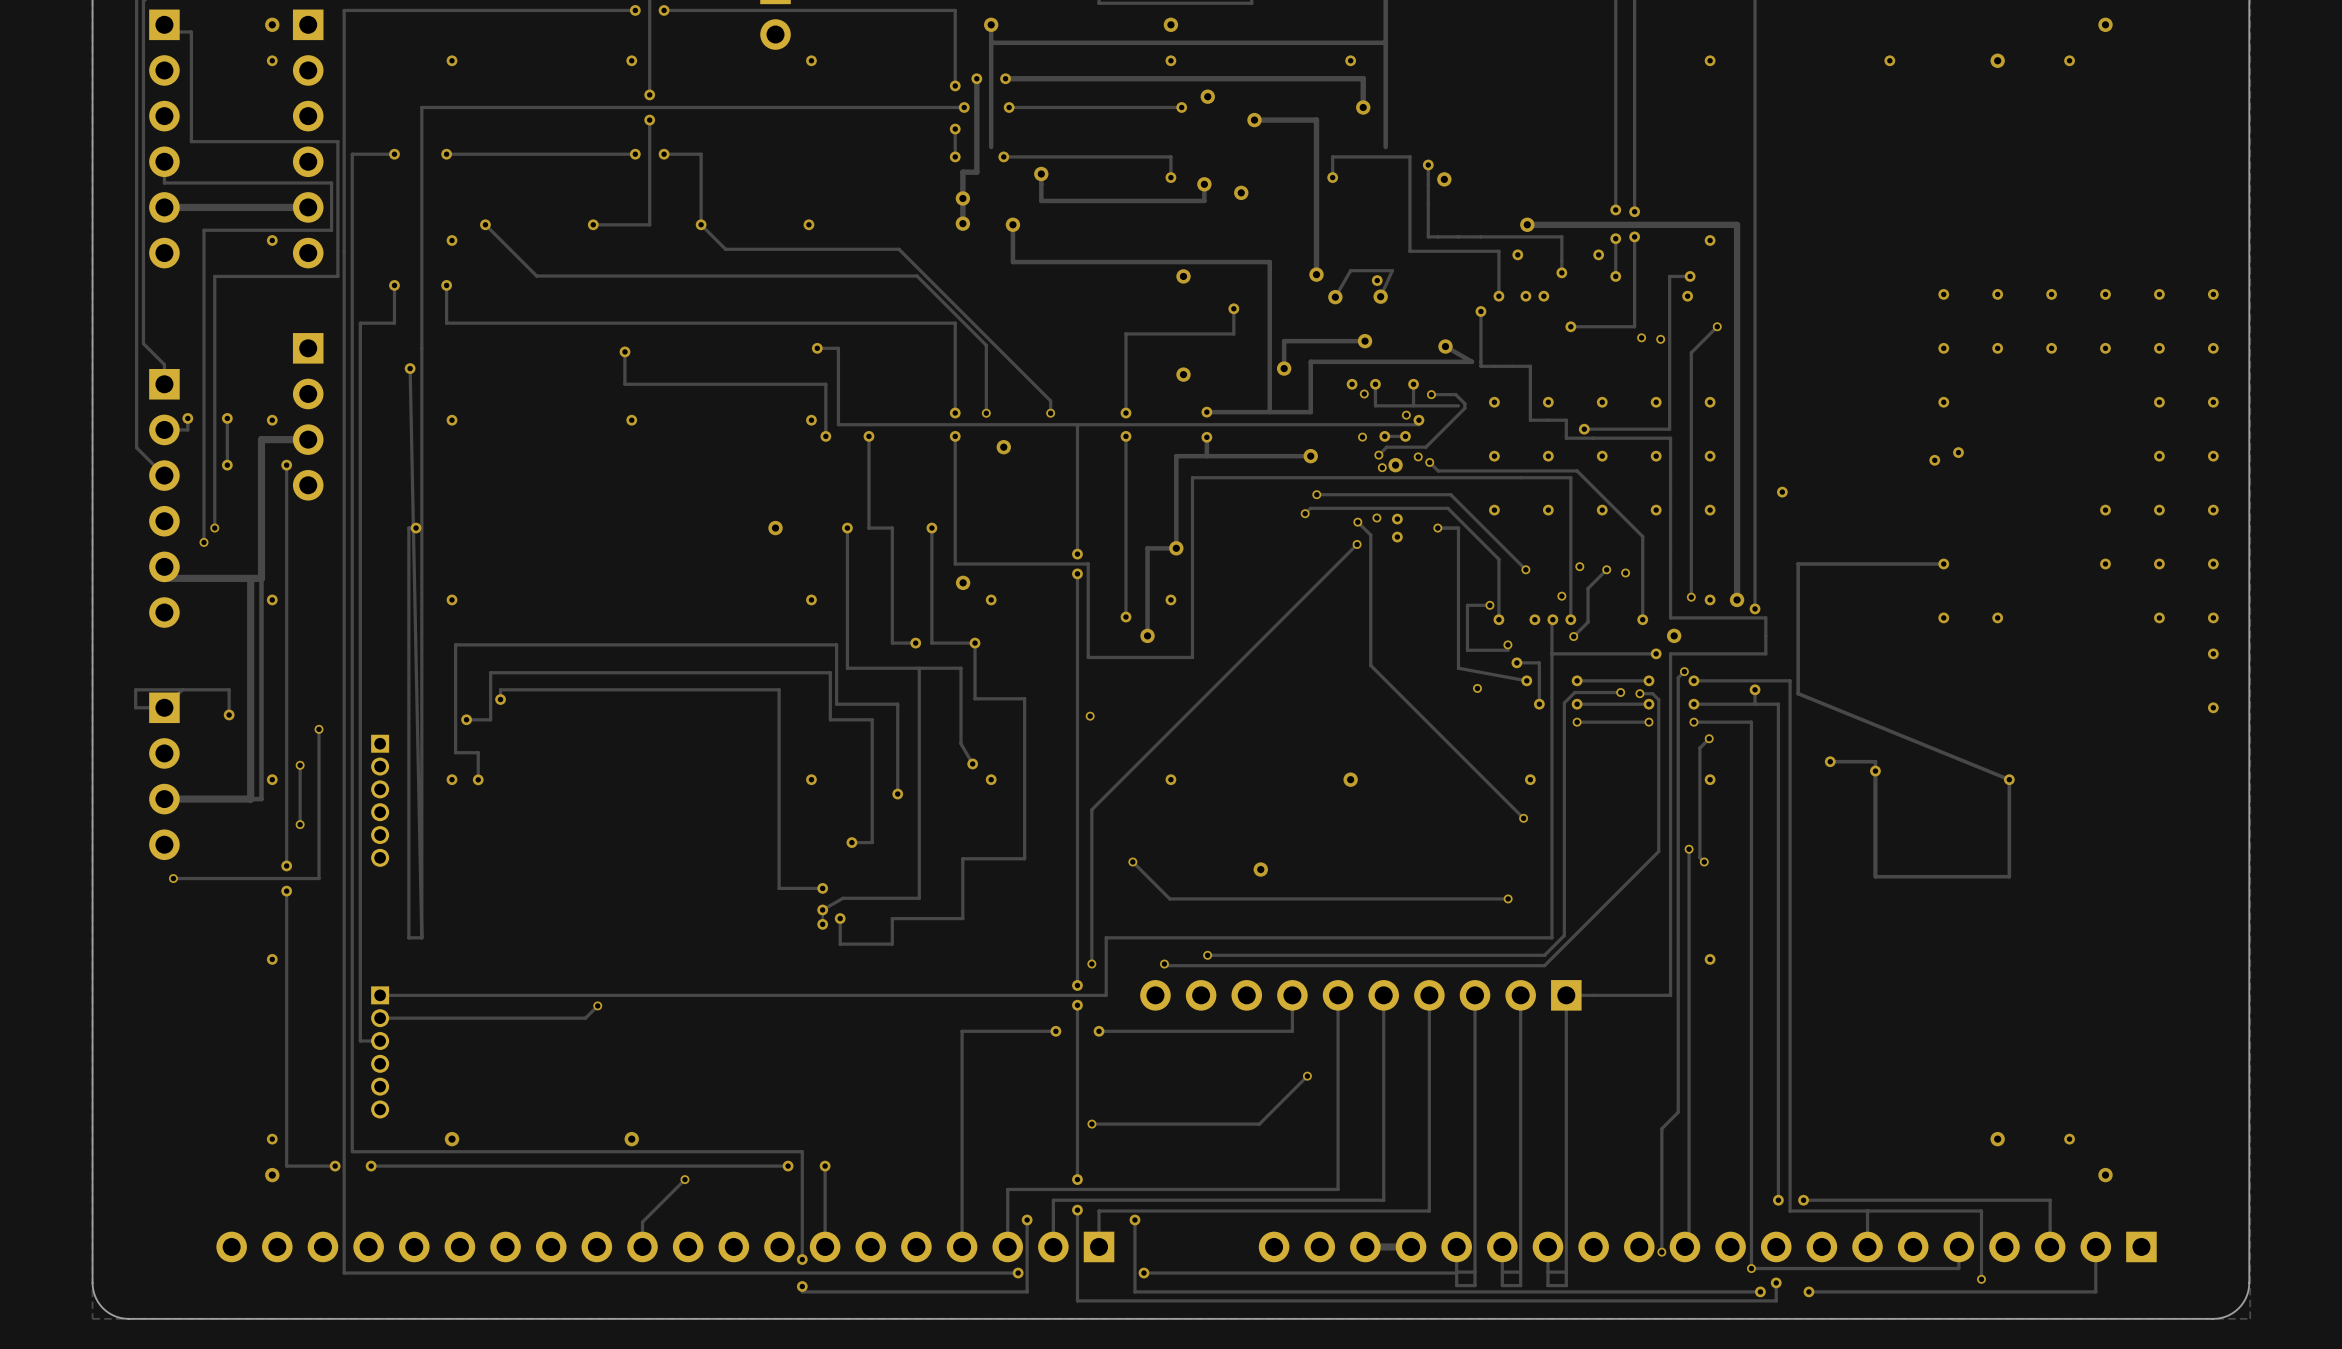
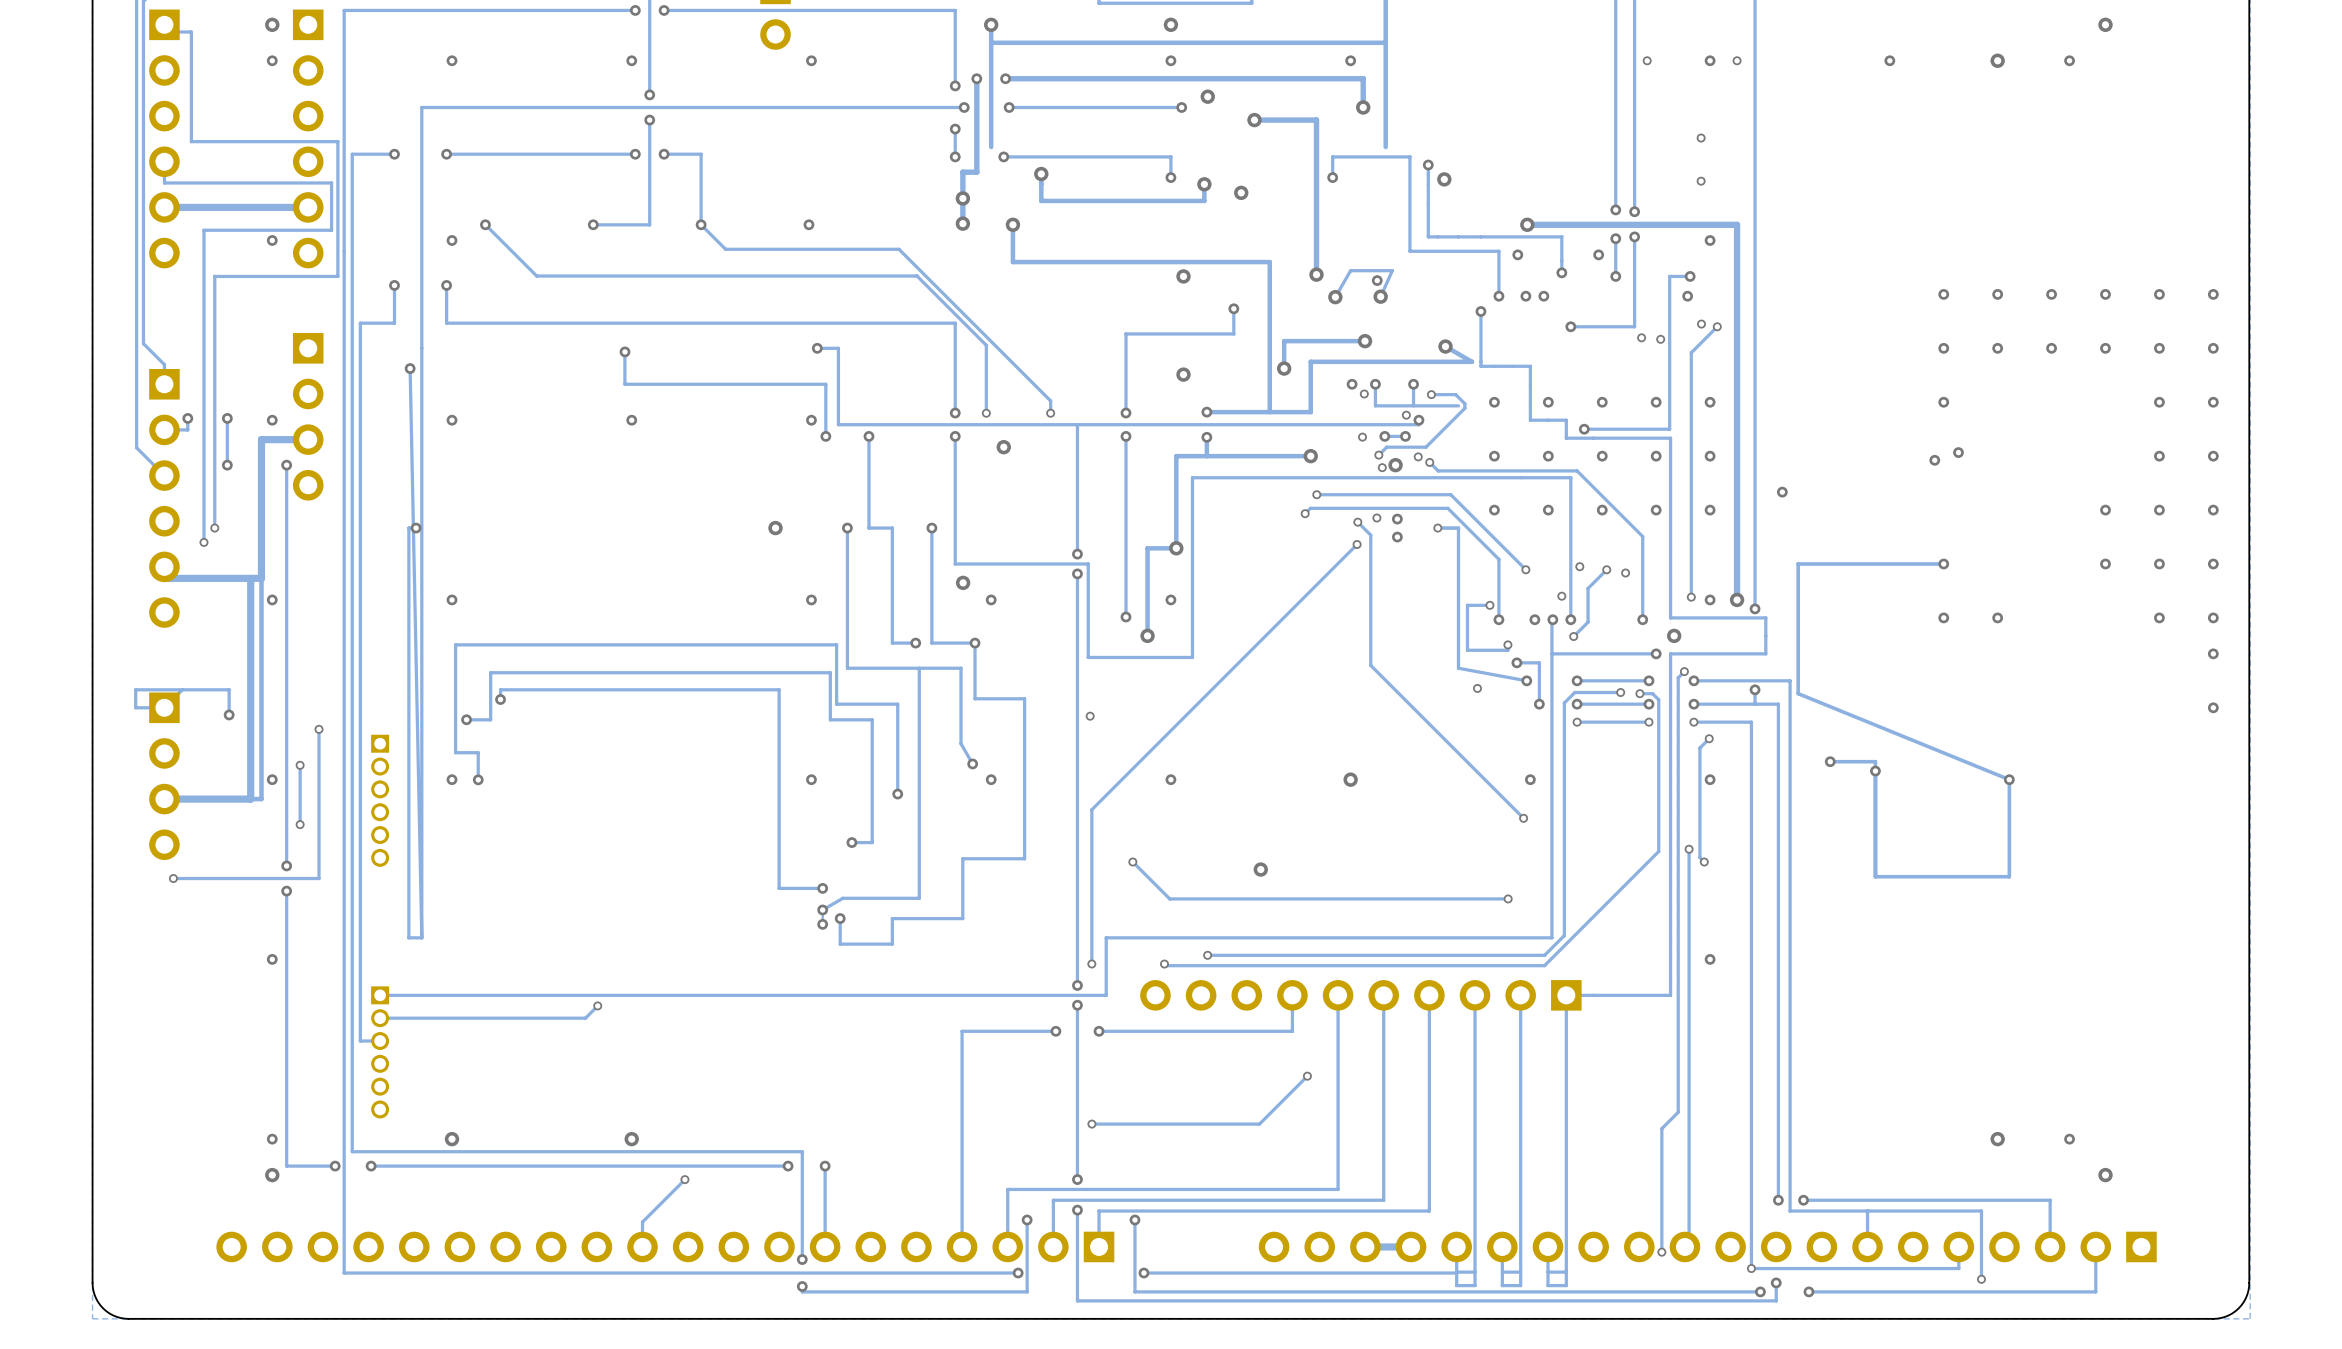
via: none -> (1647, 60)
via: none -> (1737, 60)
via: none -> (1701, 138)
via: none -> (1701, 181)
via: none -> (1701, 324)

